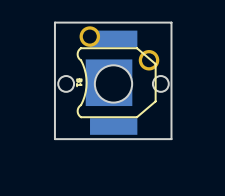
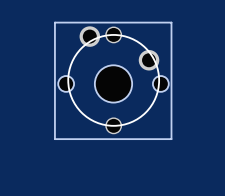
drawing: none -> [67, 34, 160, 127]
part: none -> (113, 34)
part: (116, 82) -> none
part: none -> (113, 125)

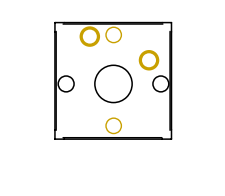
line: none -> (162, 23) (63, 23)
line: none -> (56, 31) (56, 130)
line: none -> (170, 31) (170, 130)
drawing: [67, 34, 160, 127] -> none
line: none -> (161, 137) (63, 137)

